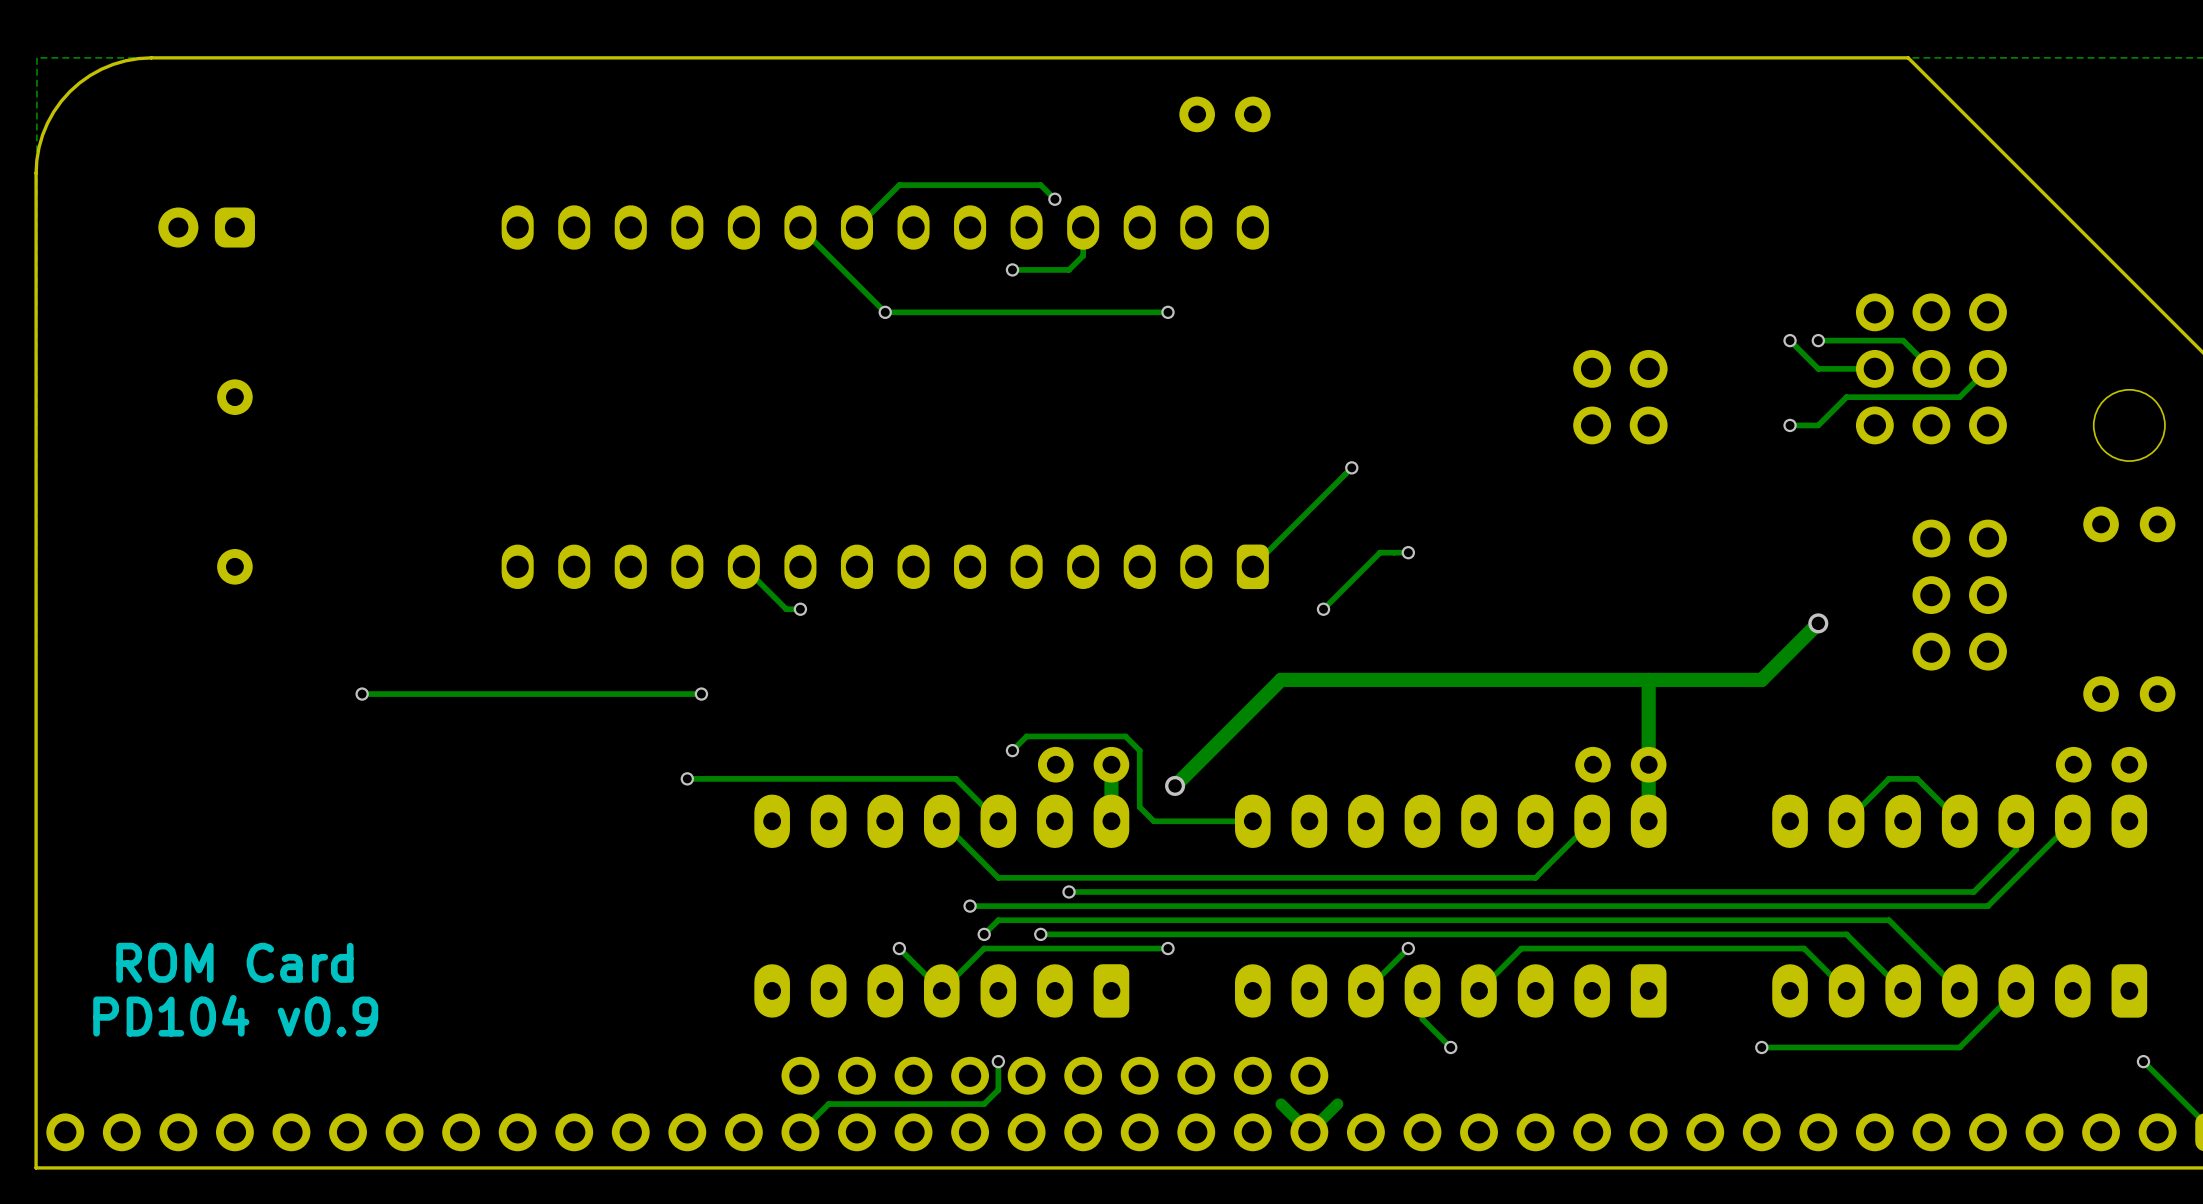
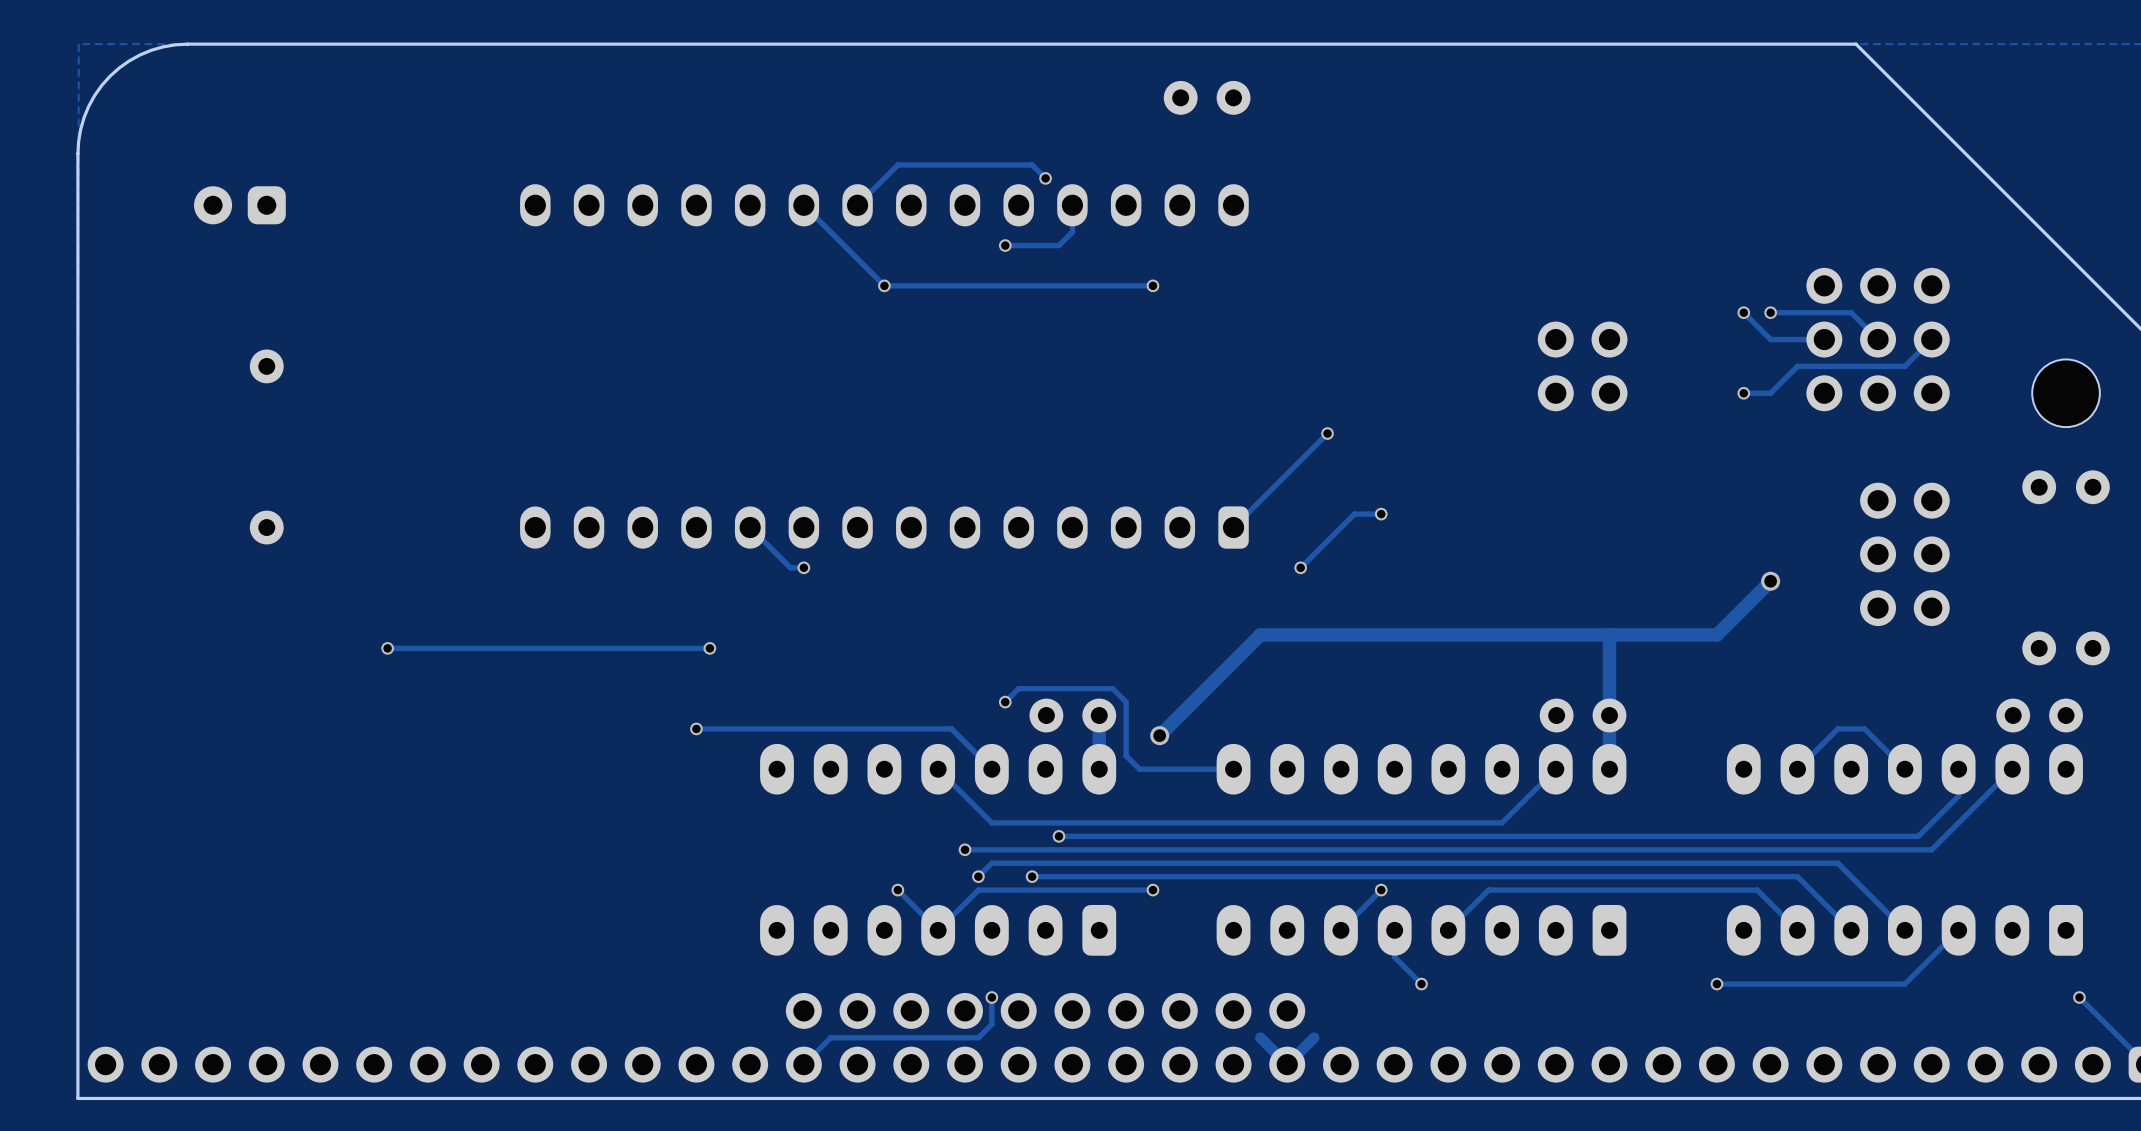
text: ROM Card (234, 962) -> none
text: PD104 v0.9 (235, 1015) -> none

